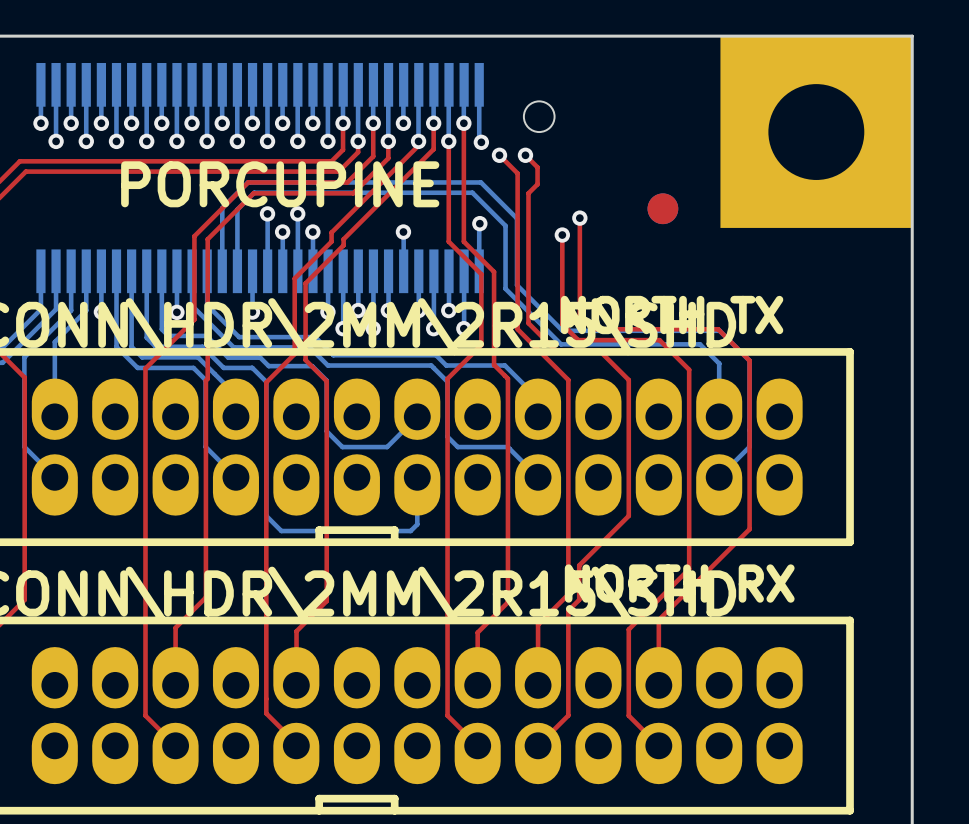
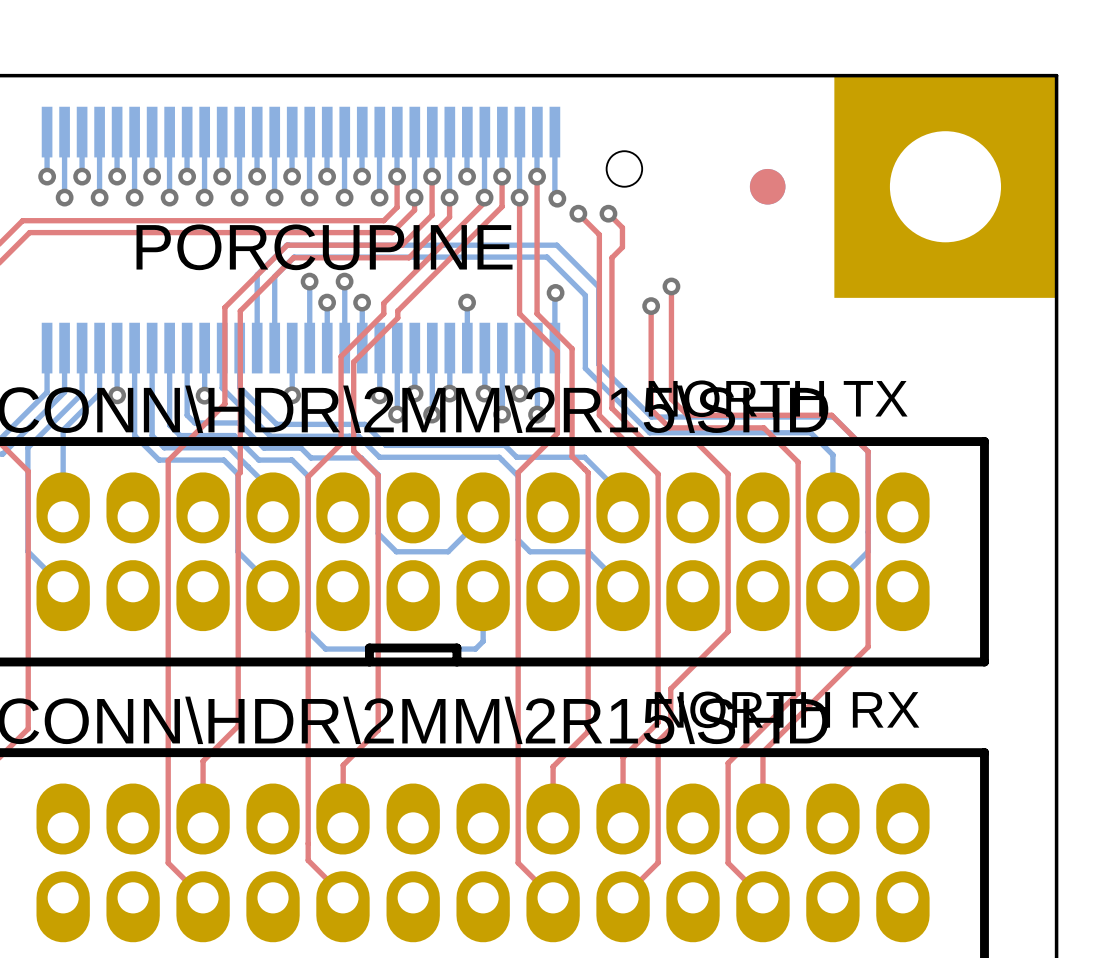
part position: (662, 208) -> (767, 186)

